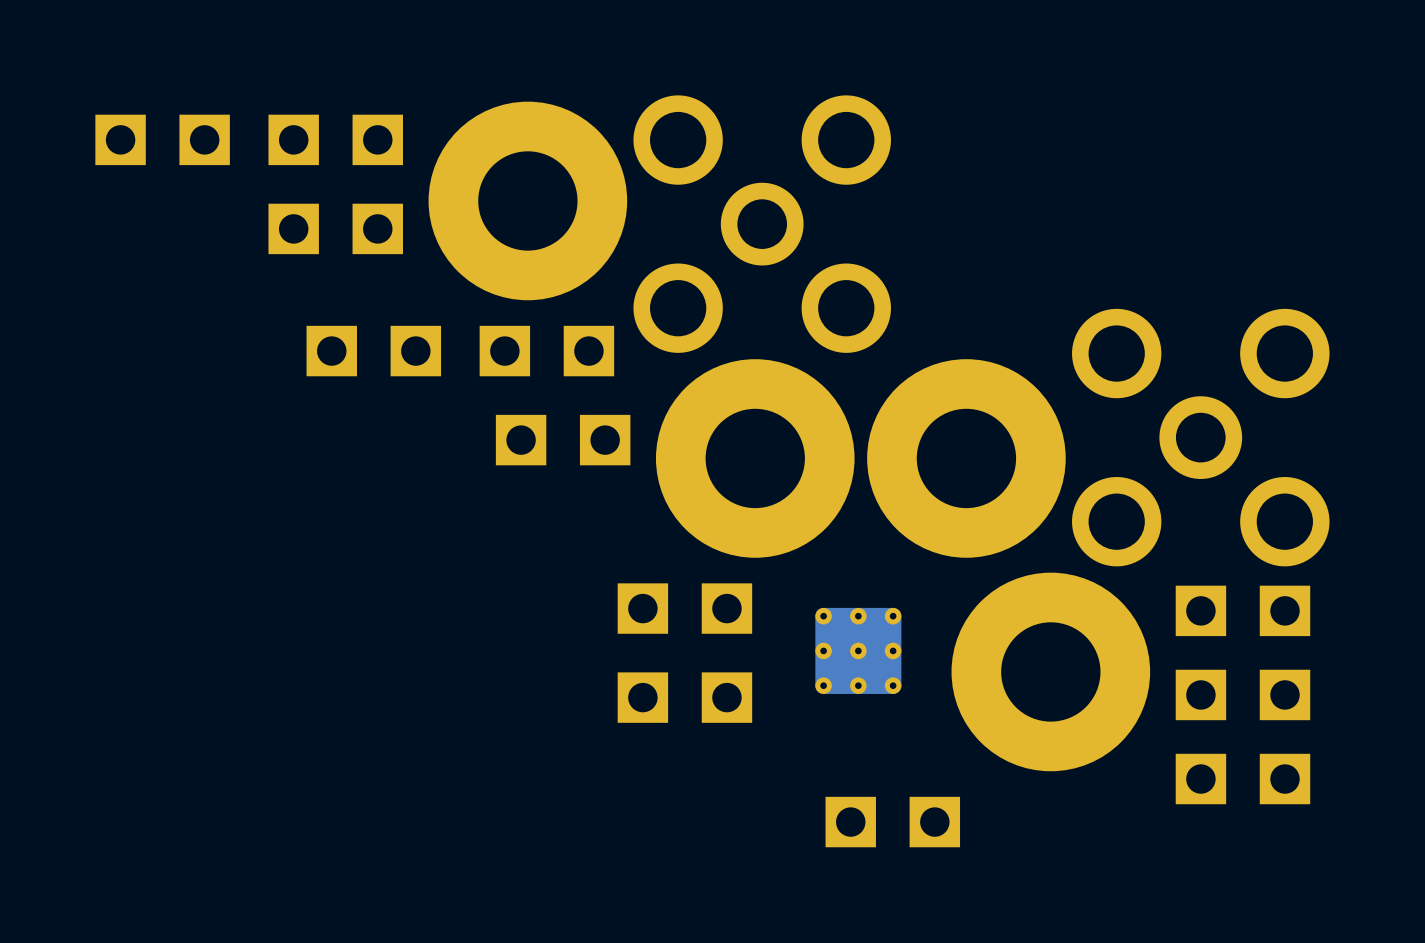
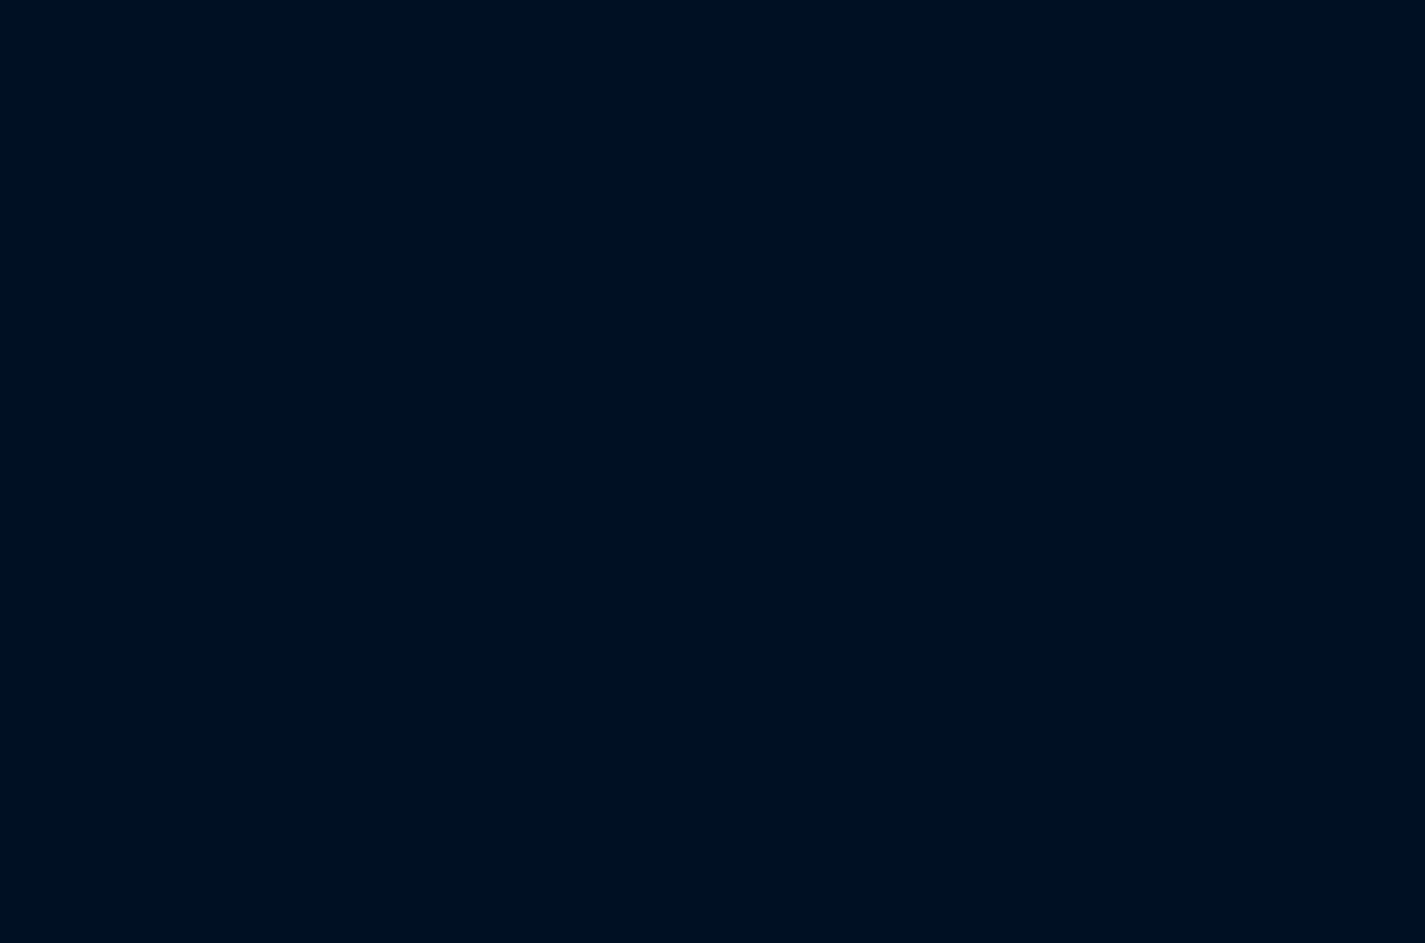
part: (162, 139) -> none
part: (335, 139) -> none
part: (527, 200) -> none
part: (762, 224) -> none
part: (335, 228) -> none
part: (373, 351) -> none
part: (546, 351) -> none
part: (1200, 437) -> none
part: (563, 440) -> none
part: (755, 458) -> none
part: (966, 458) -> none
part: (684, 608) -> none
part: (858, 650) -> none
part: (1050, 671) -> none
part: (1242, 694) -> none
part: (684, 697) -> none
part: (892, 822) -> none

